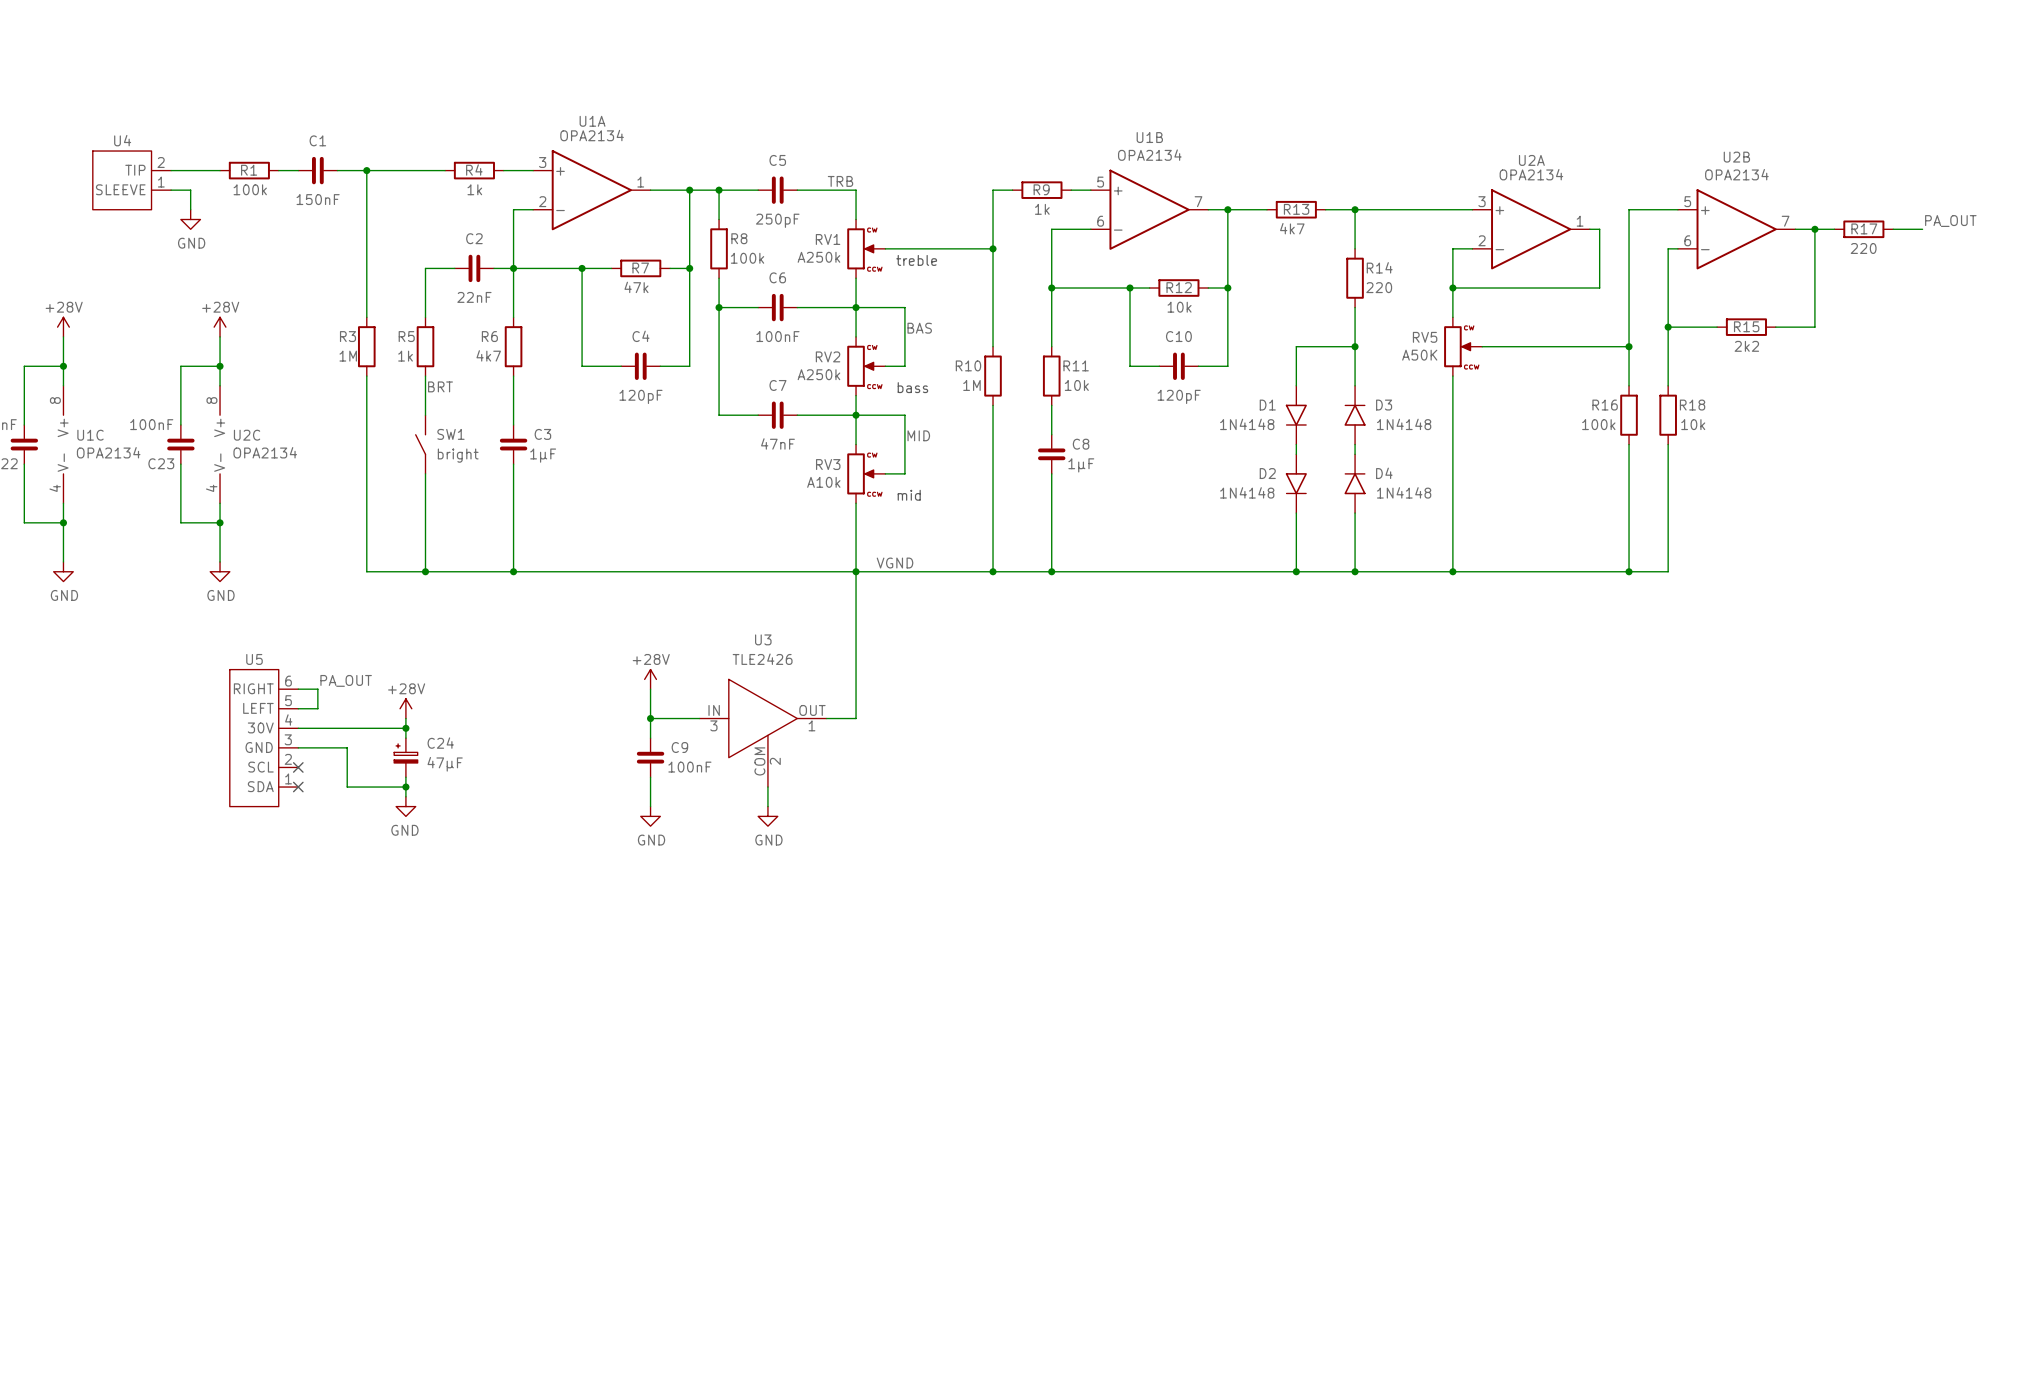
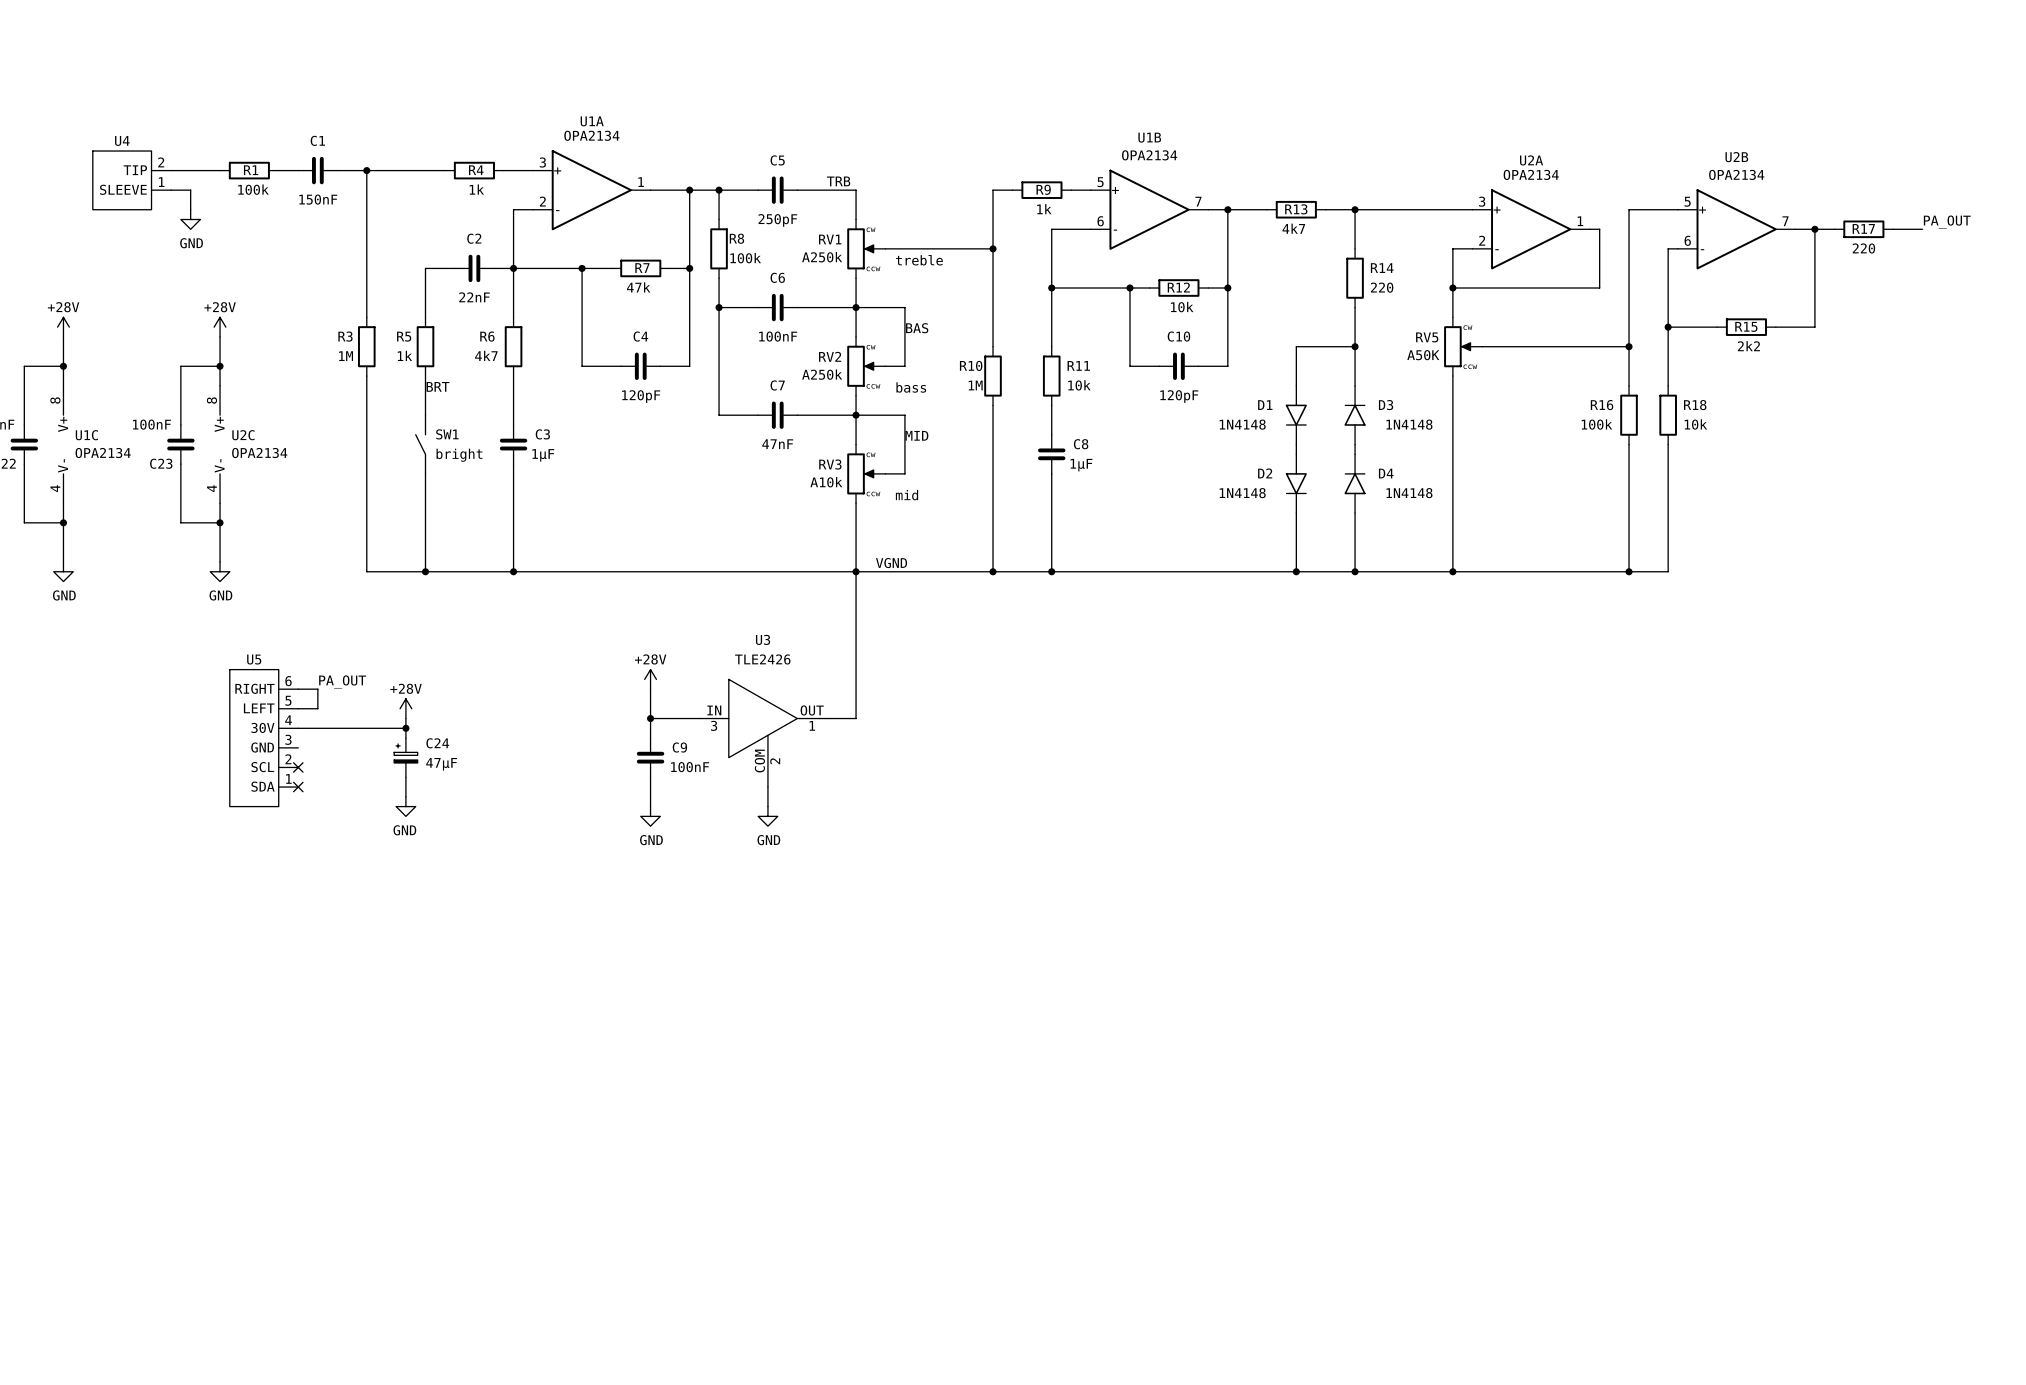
wire: (298, 747) (347, 747) (347, 787) (405, 787) -> none
junction: (405, 787) -> none

